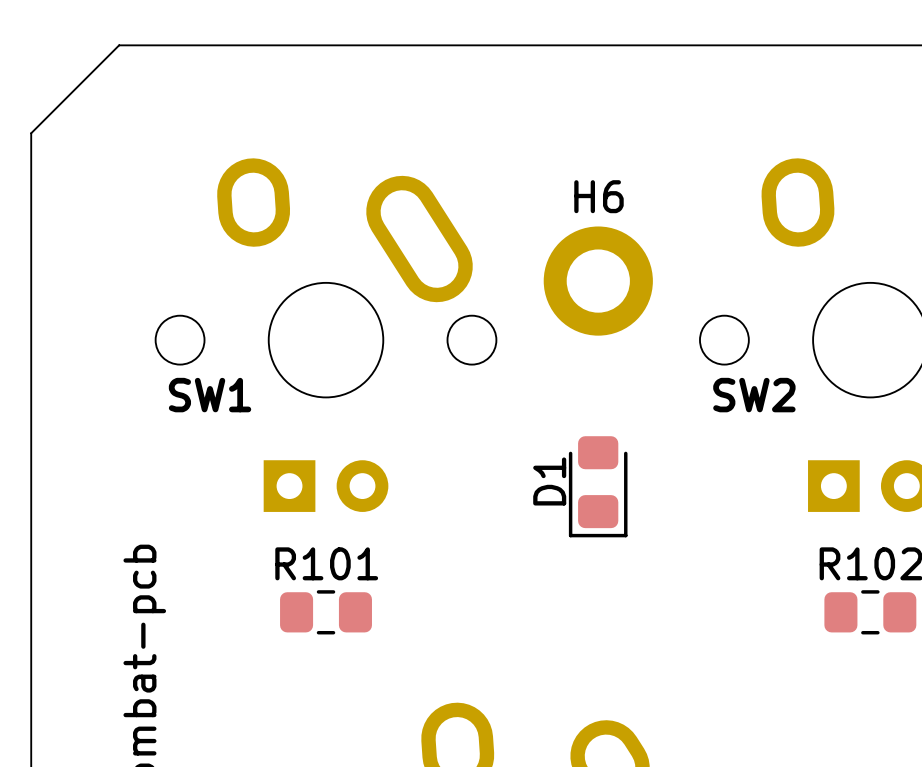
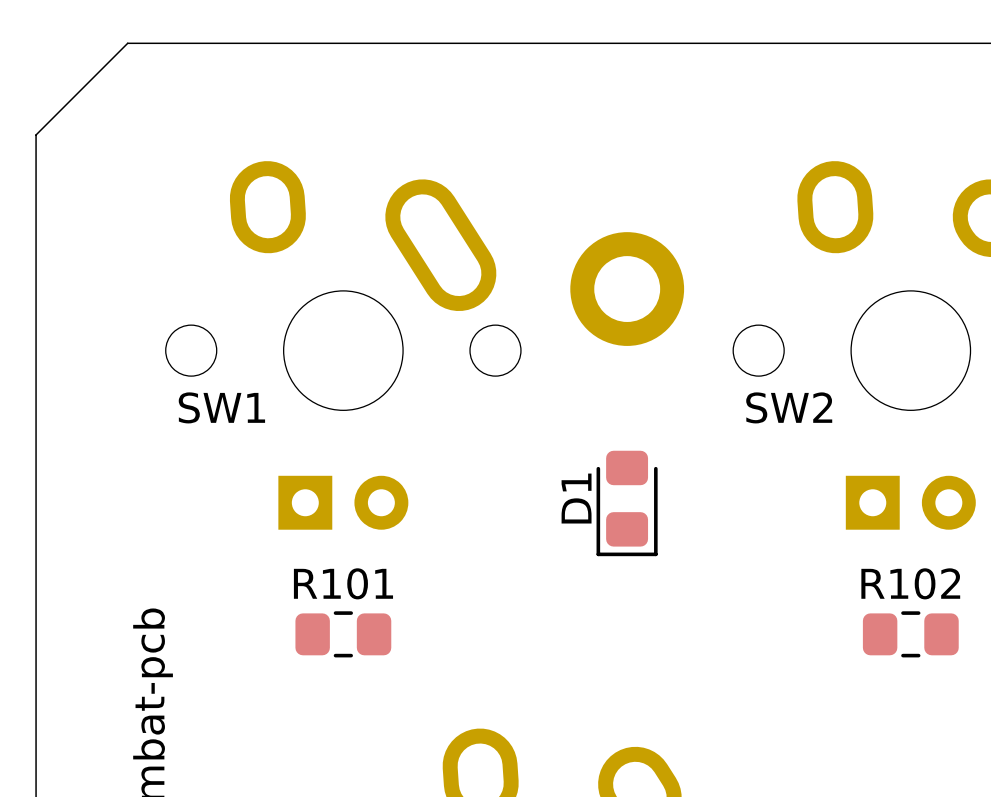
H6 name: H6 (598, 196) -> none

